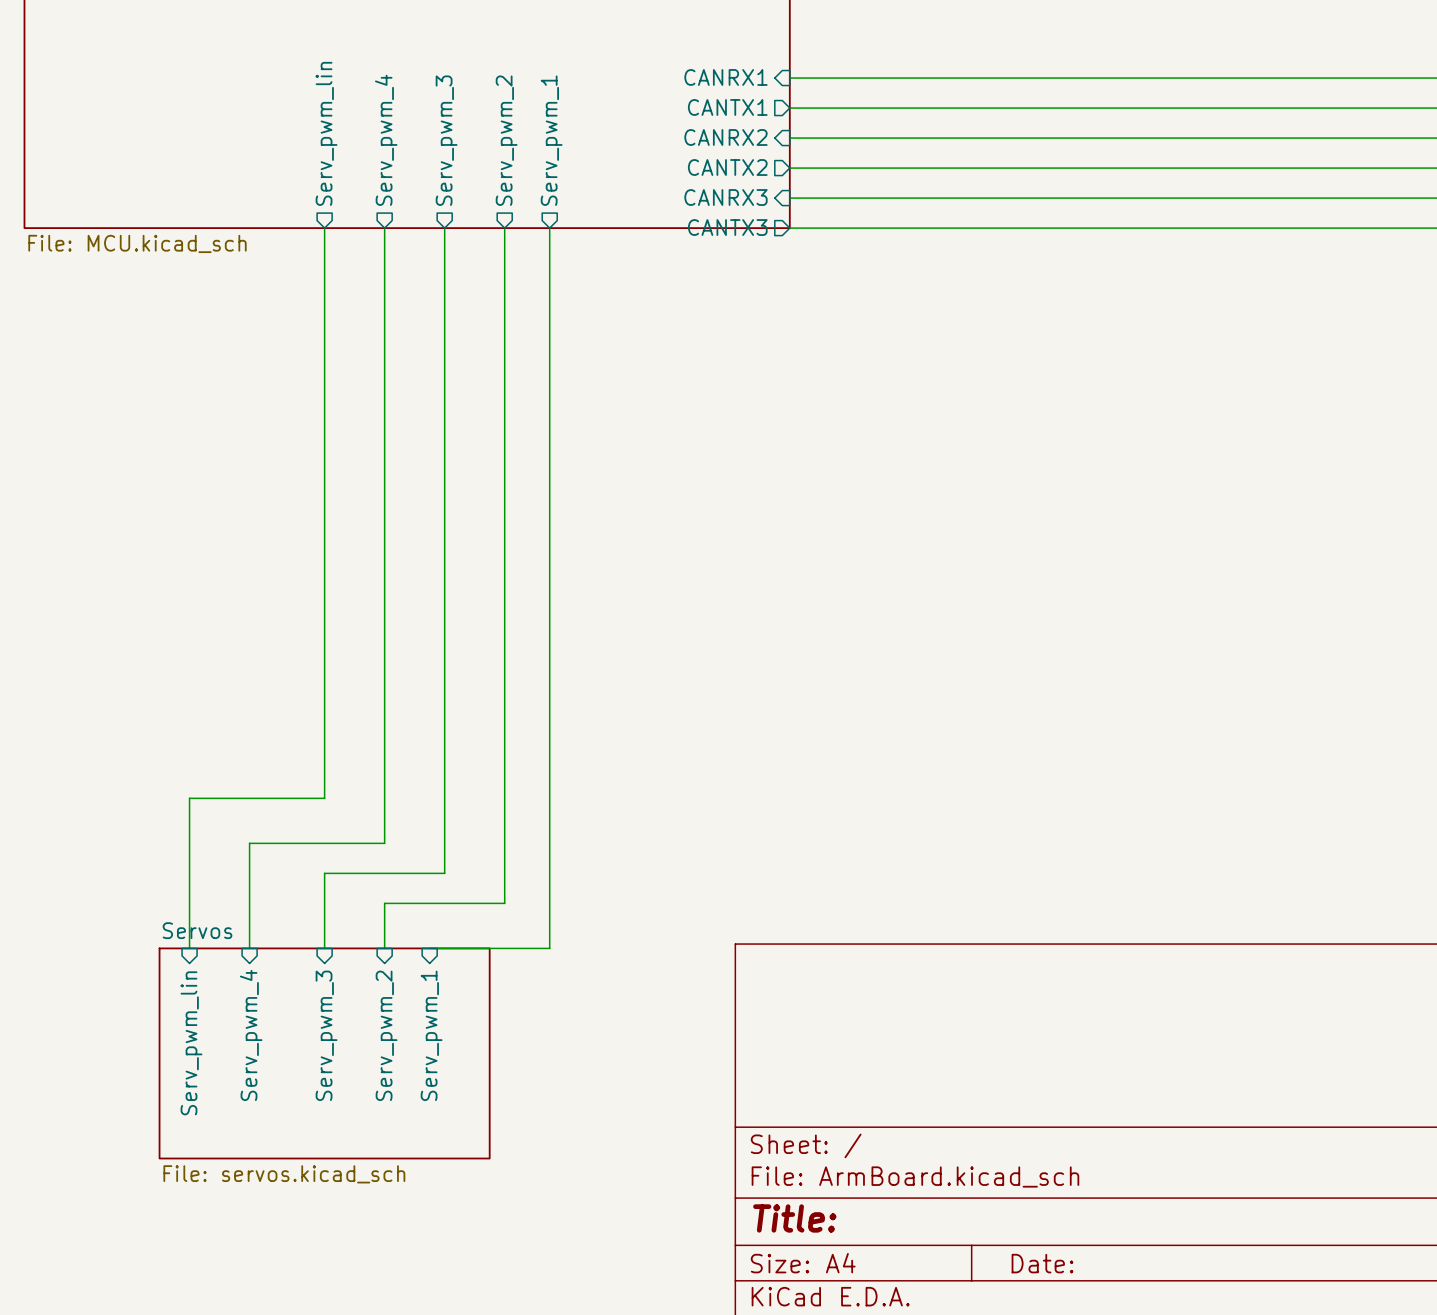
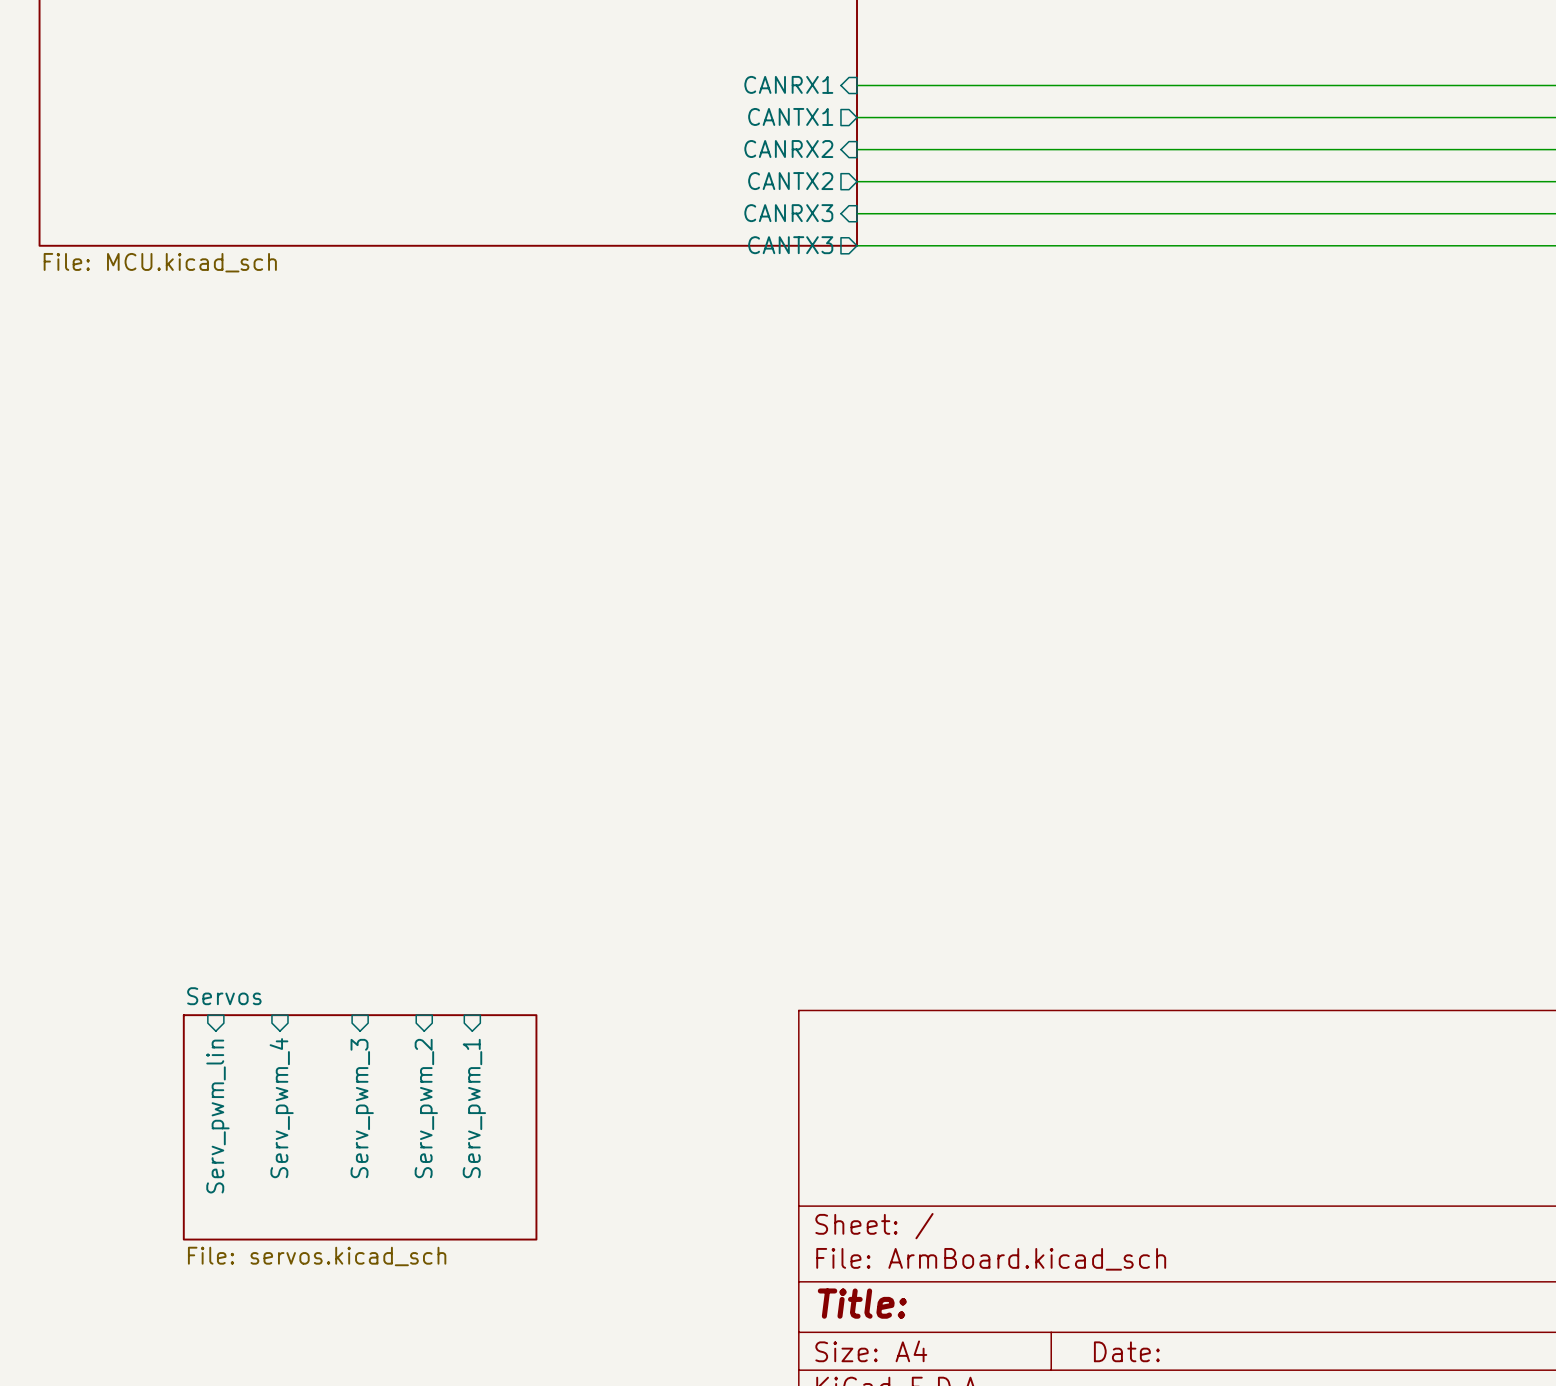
sheet pin: Serv_pwm_lin (326, 133) -> none
sheet pin: Serv_pwm_4 (386, 140) -> none
sheet pin: Serv_pwm_3 (446, 140) -> none
sheet pin: Serv_pwm_2 (506, 140) -> none
sheet pin: Serv_pwm_1 (551, 140) -> none
wire: (324, 228) (324, 798) (189, 798) (189, 948) -> none
wire: (384, 228) (384, 843) (249, 843) (249, 948) -> none
wire: (444, 228) (444, 873) (324, 873) (324, 948) -> none
wire: (504, 228) (504, 903) (384, 903) (384, 948) -> none
wire: (549, 228) (549, 948) (429, 948) -> none

